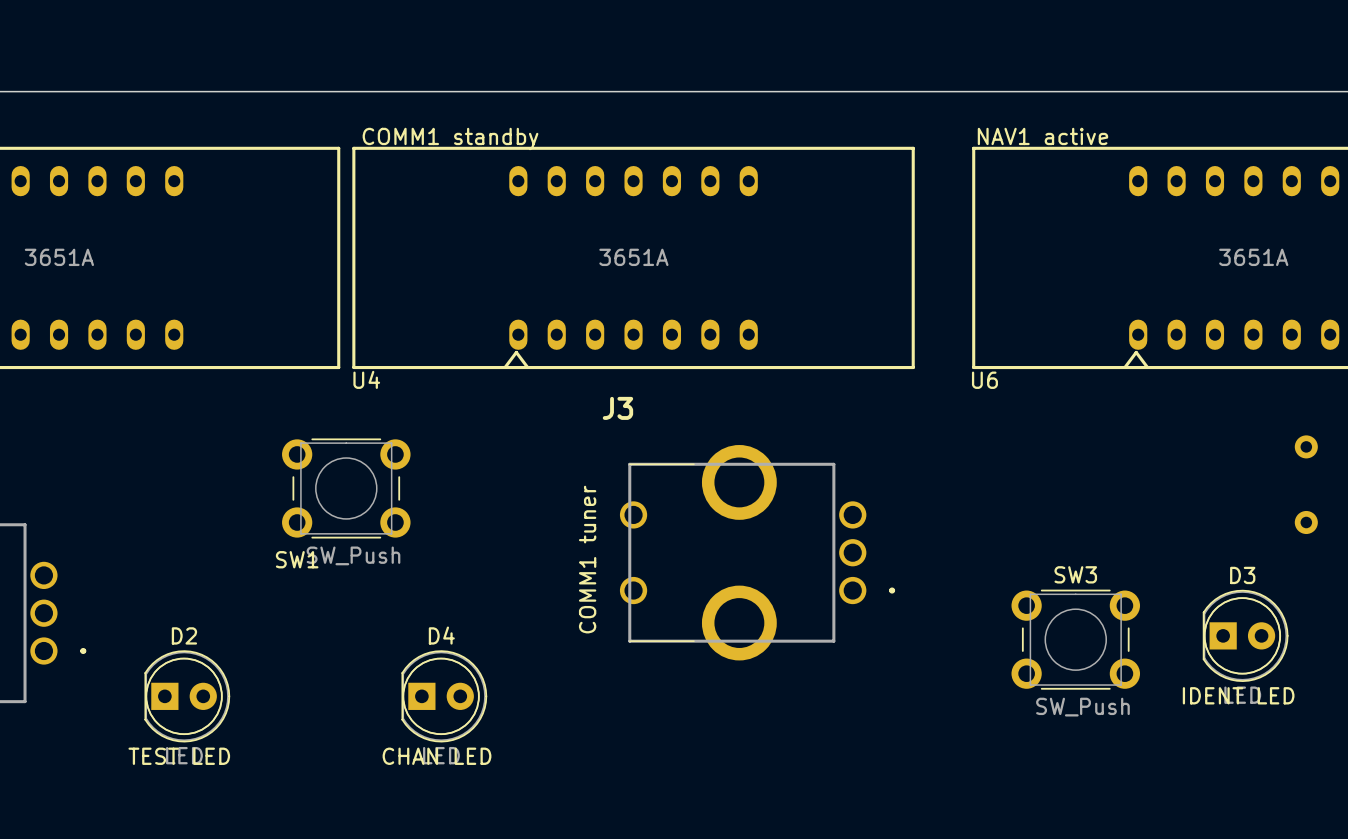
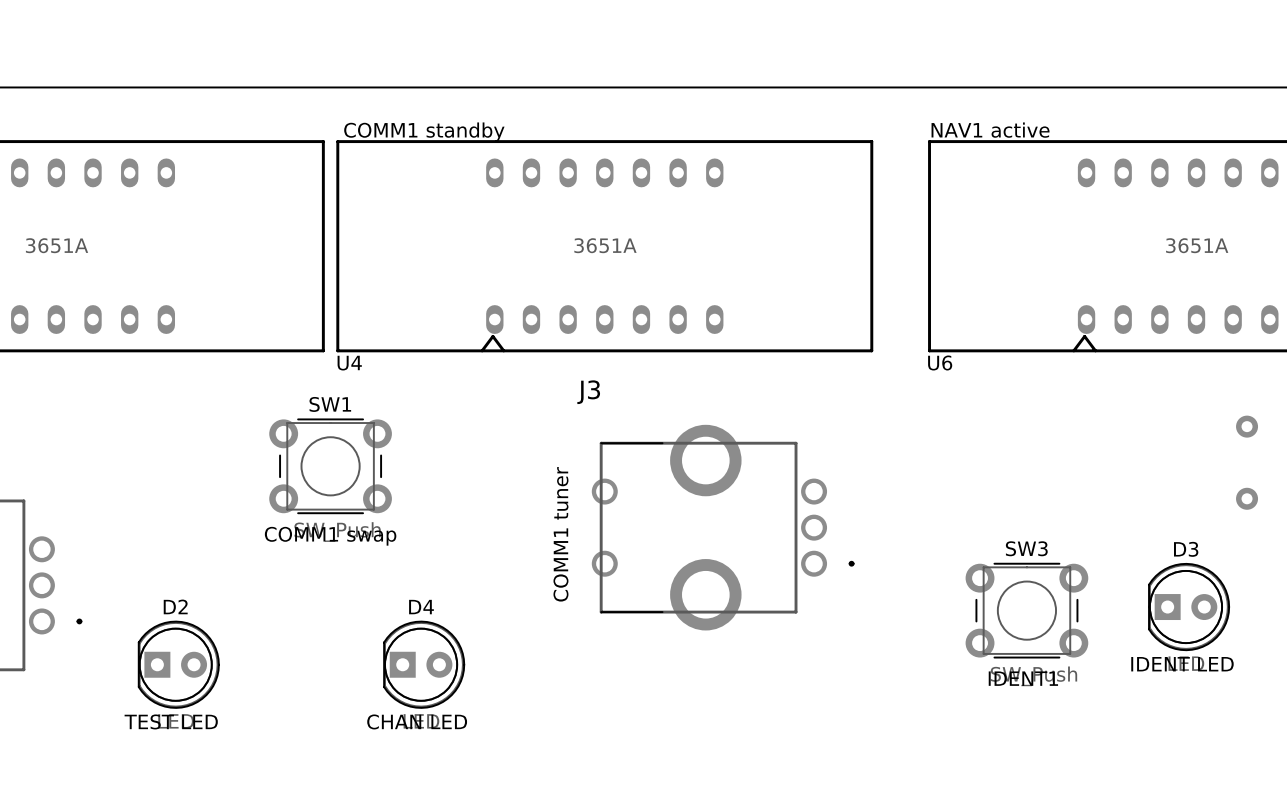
SW1 name position: SW1 (297, 559) -> SW1 (330, 404)
text: none -> COMM1 swap (330, 536)
text: none -> IDENT1 (1023, 678)

